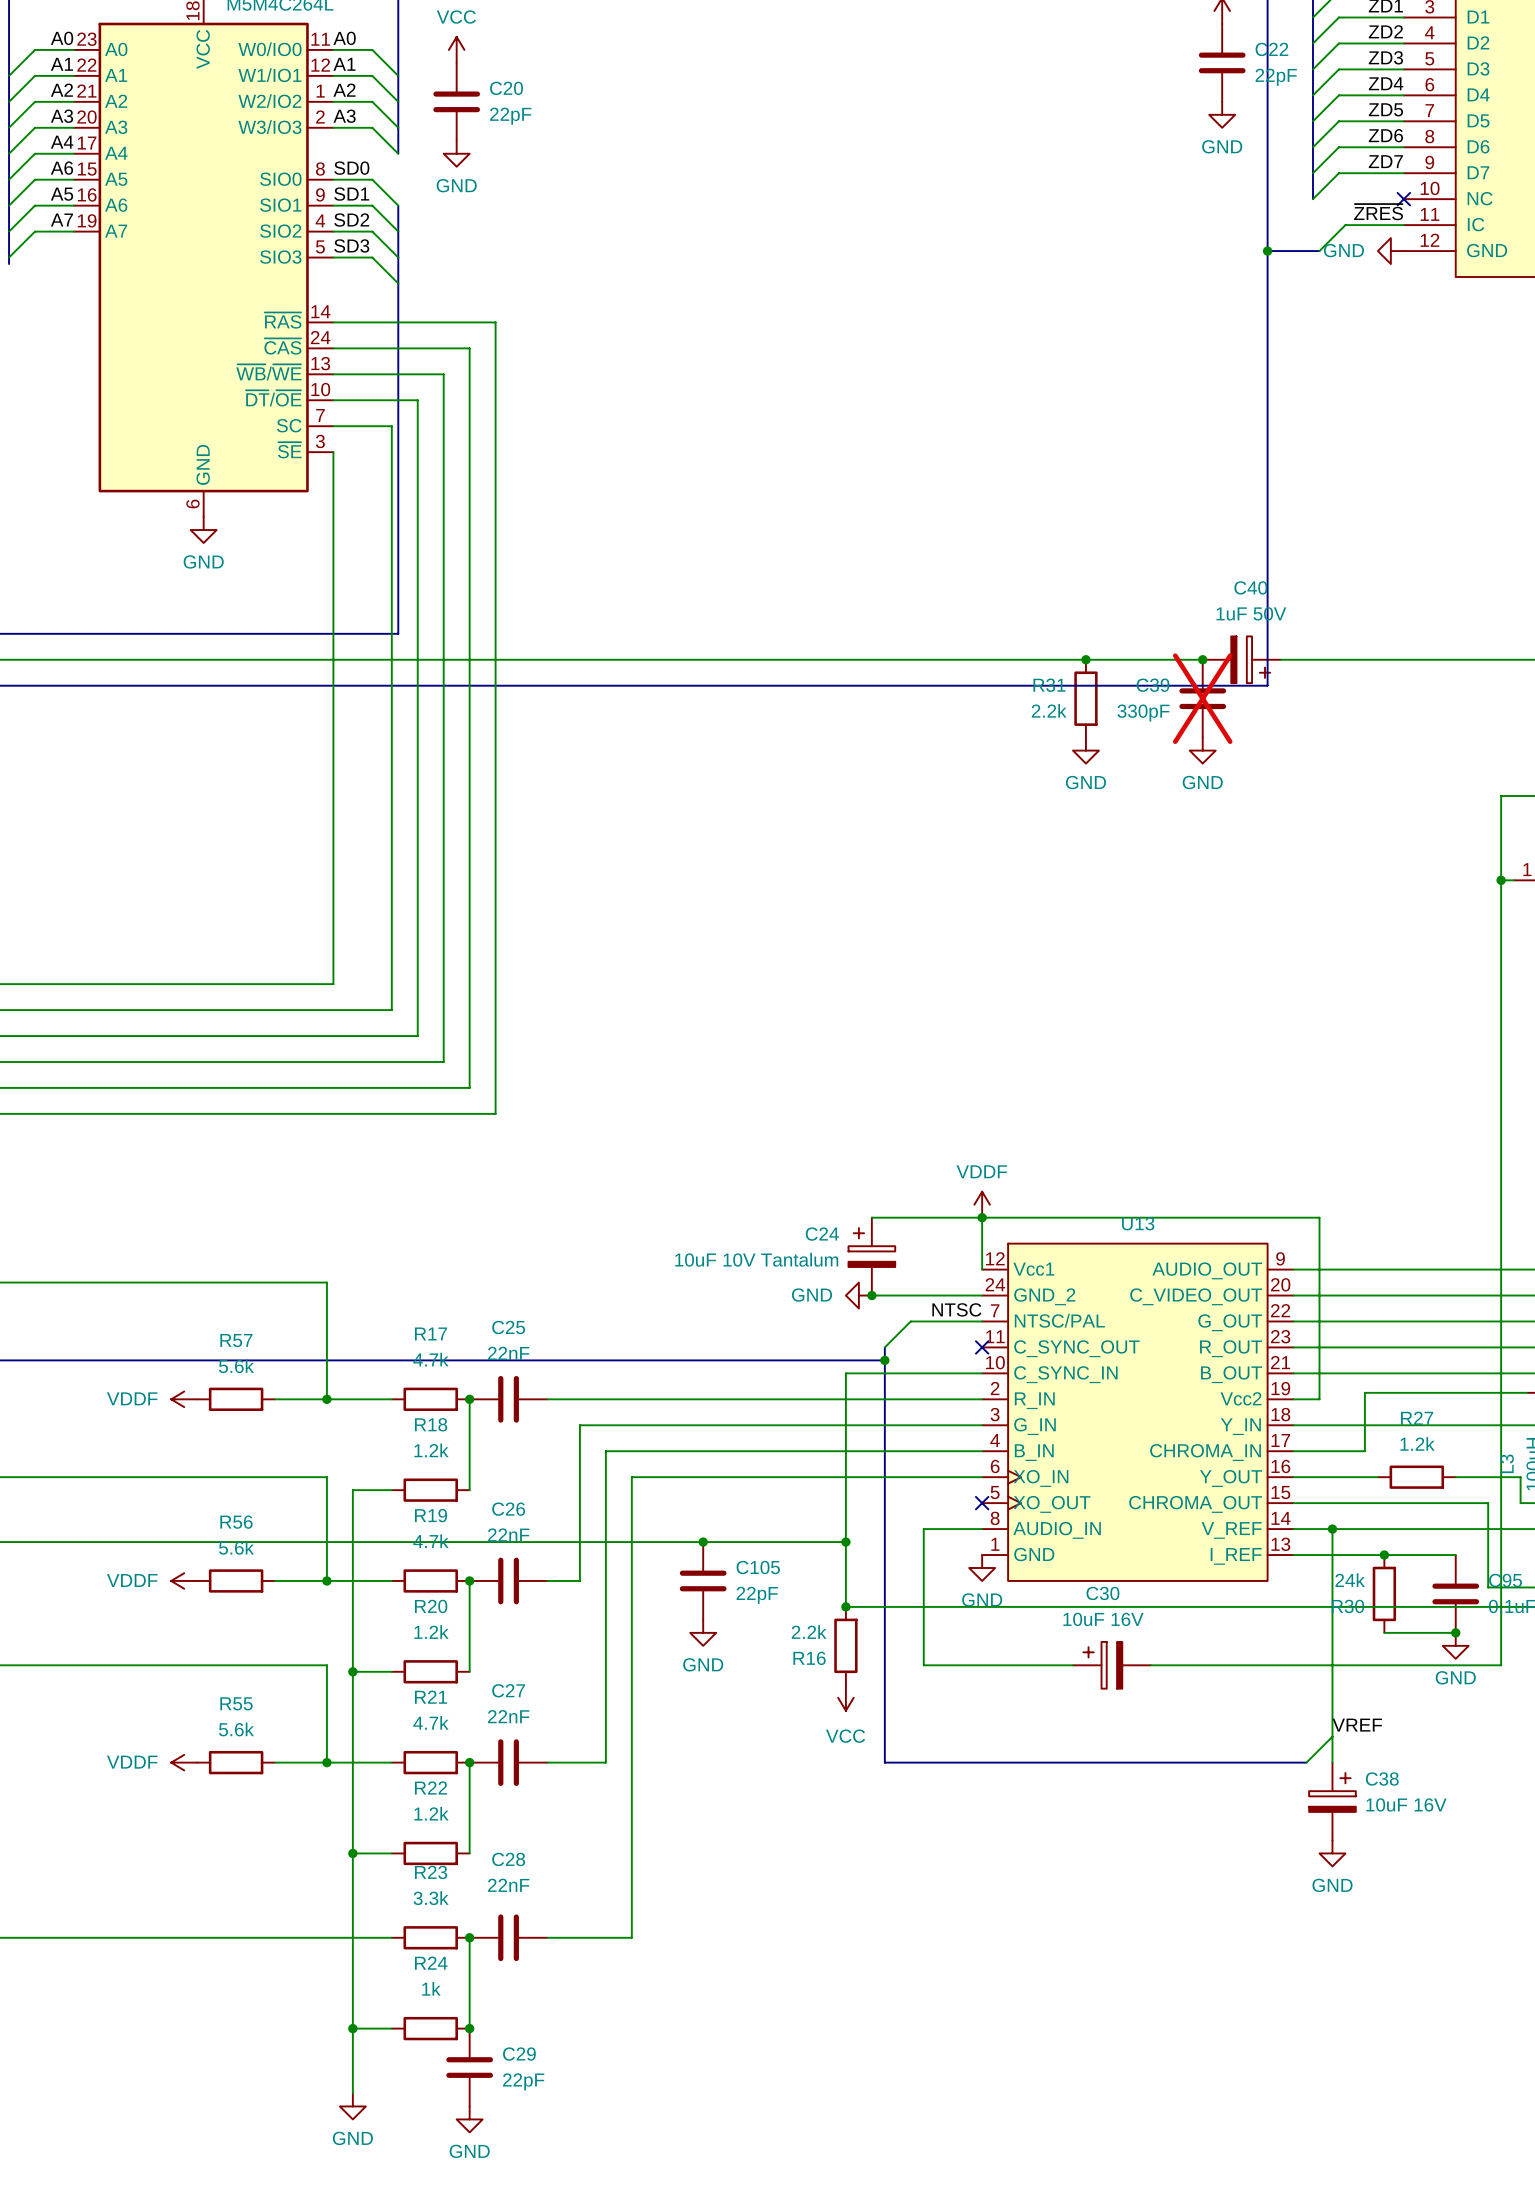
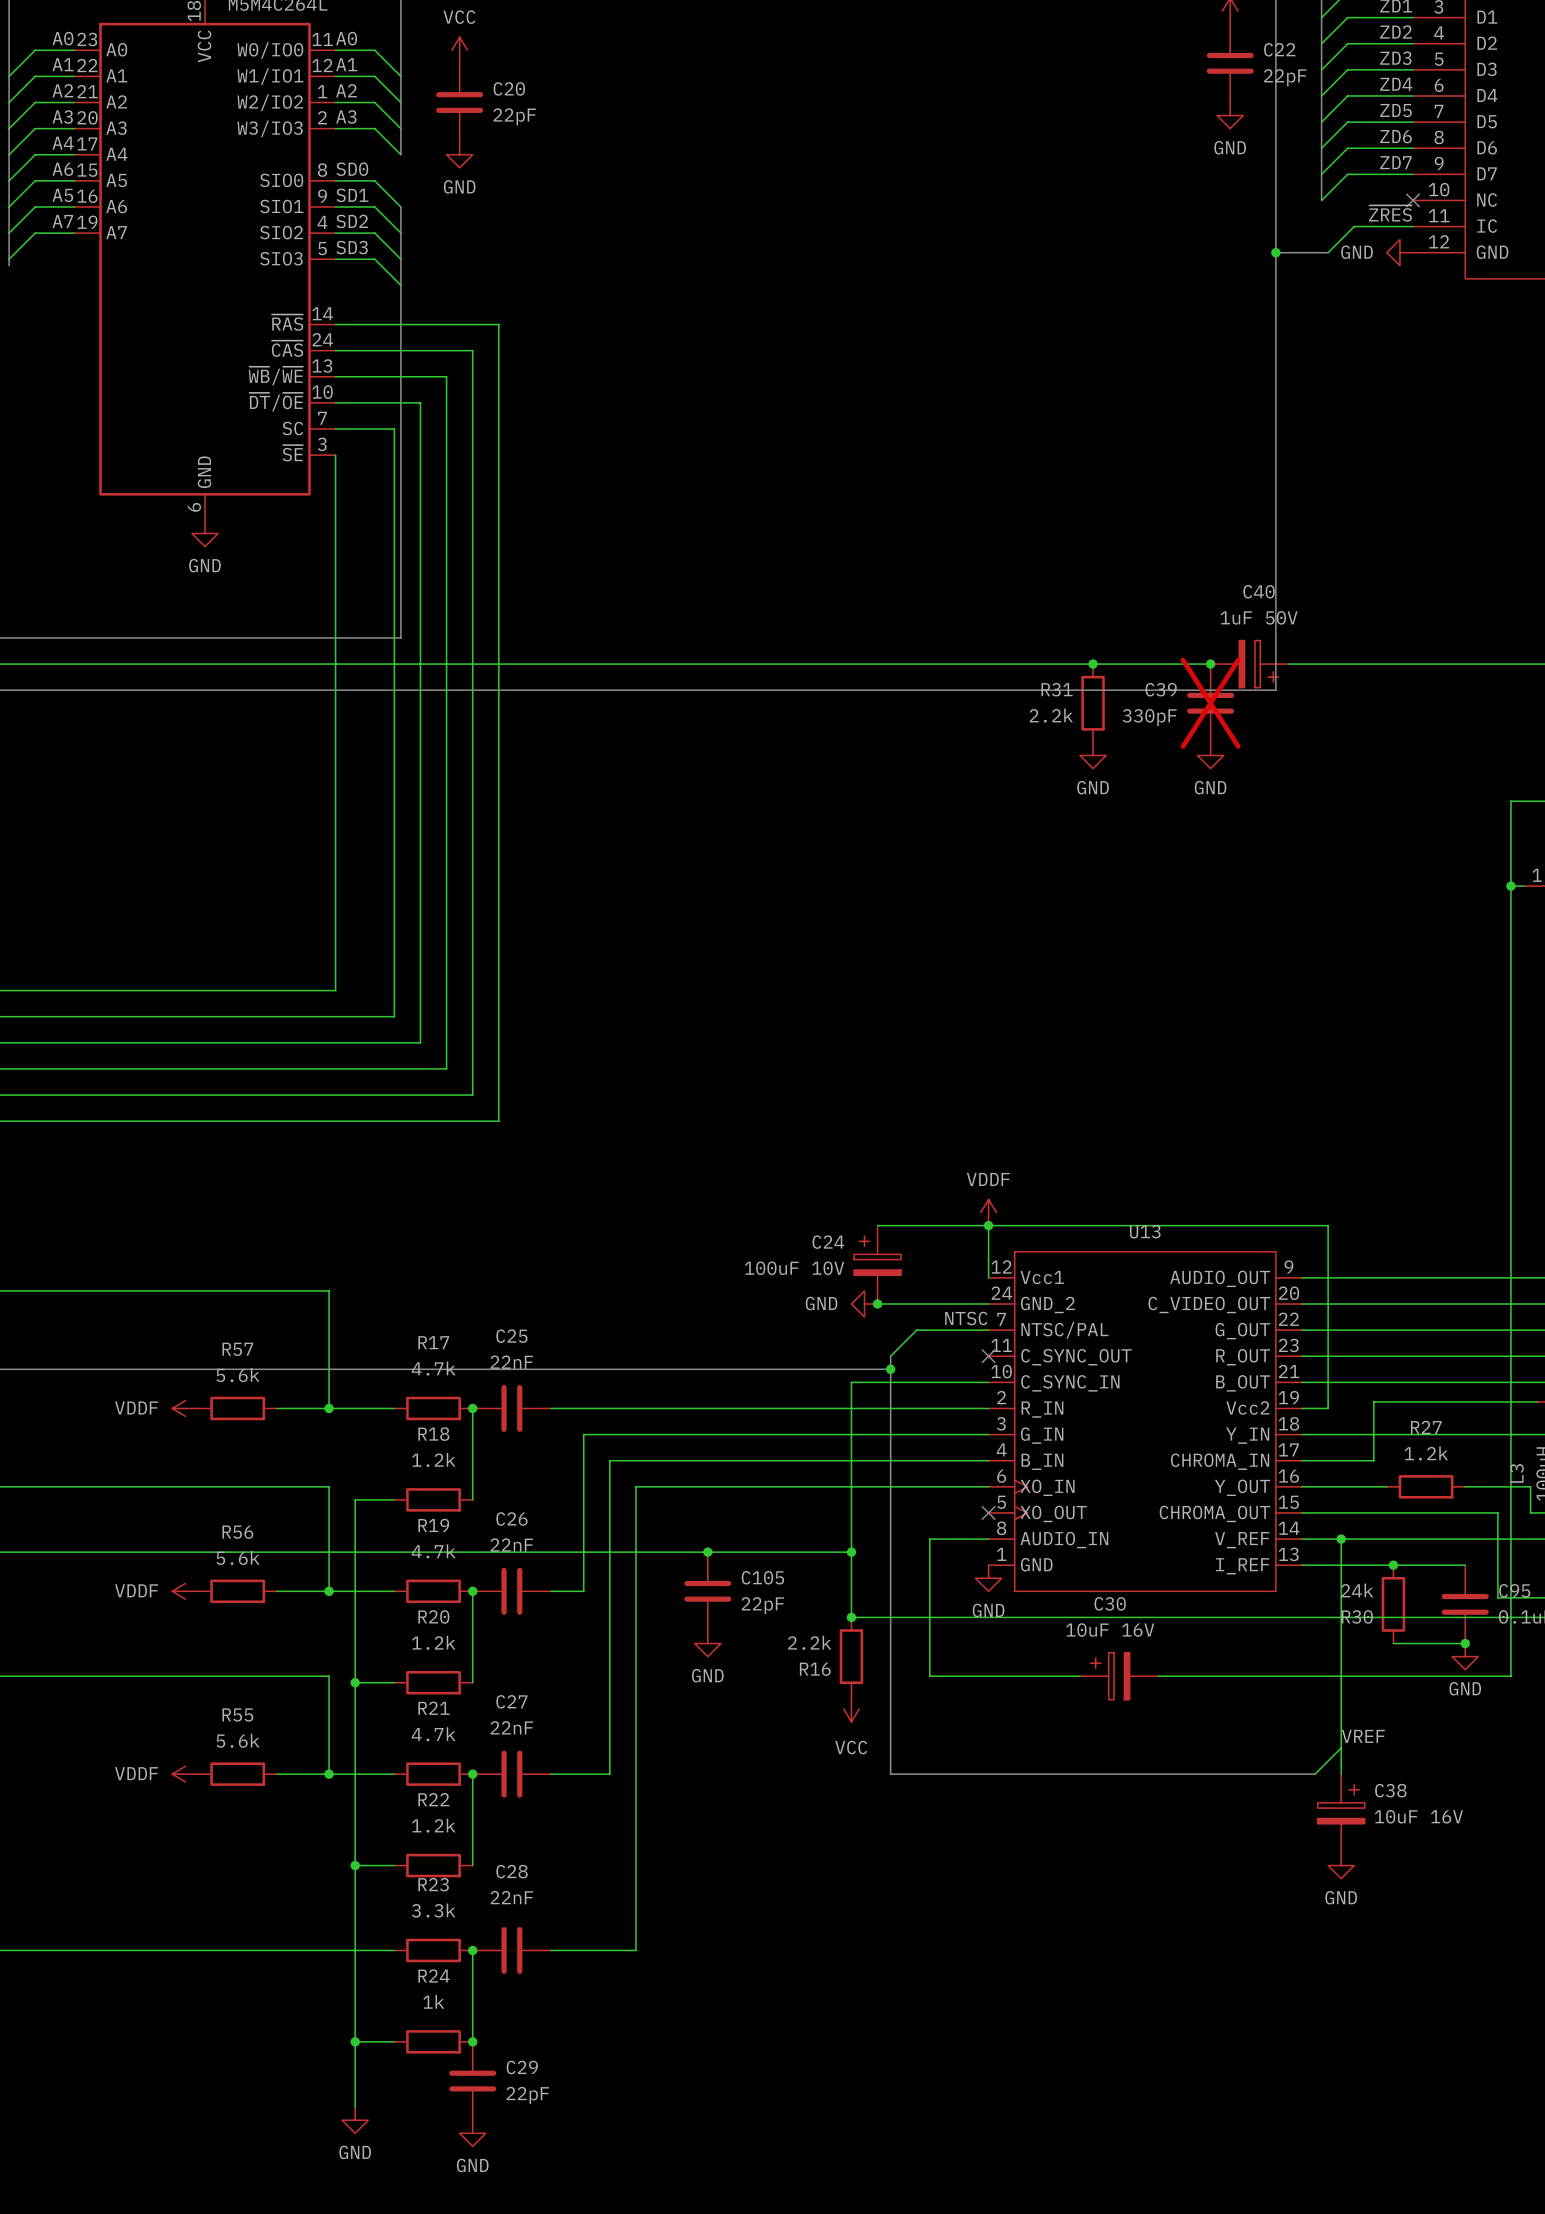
C24 value: 10uF 10V Tantalum (756, 1259) -> 100uF 10V (794, 1268)

